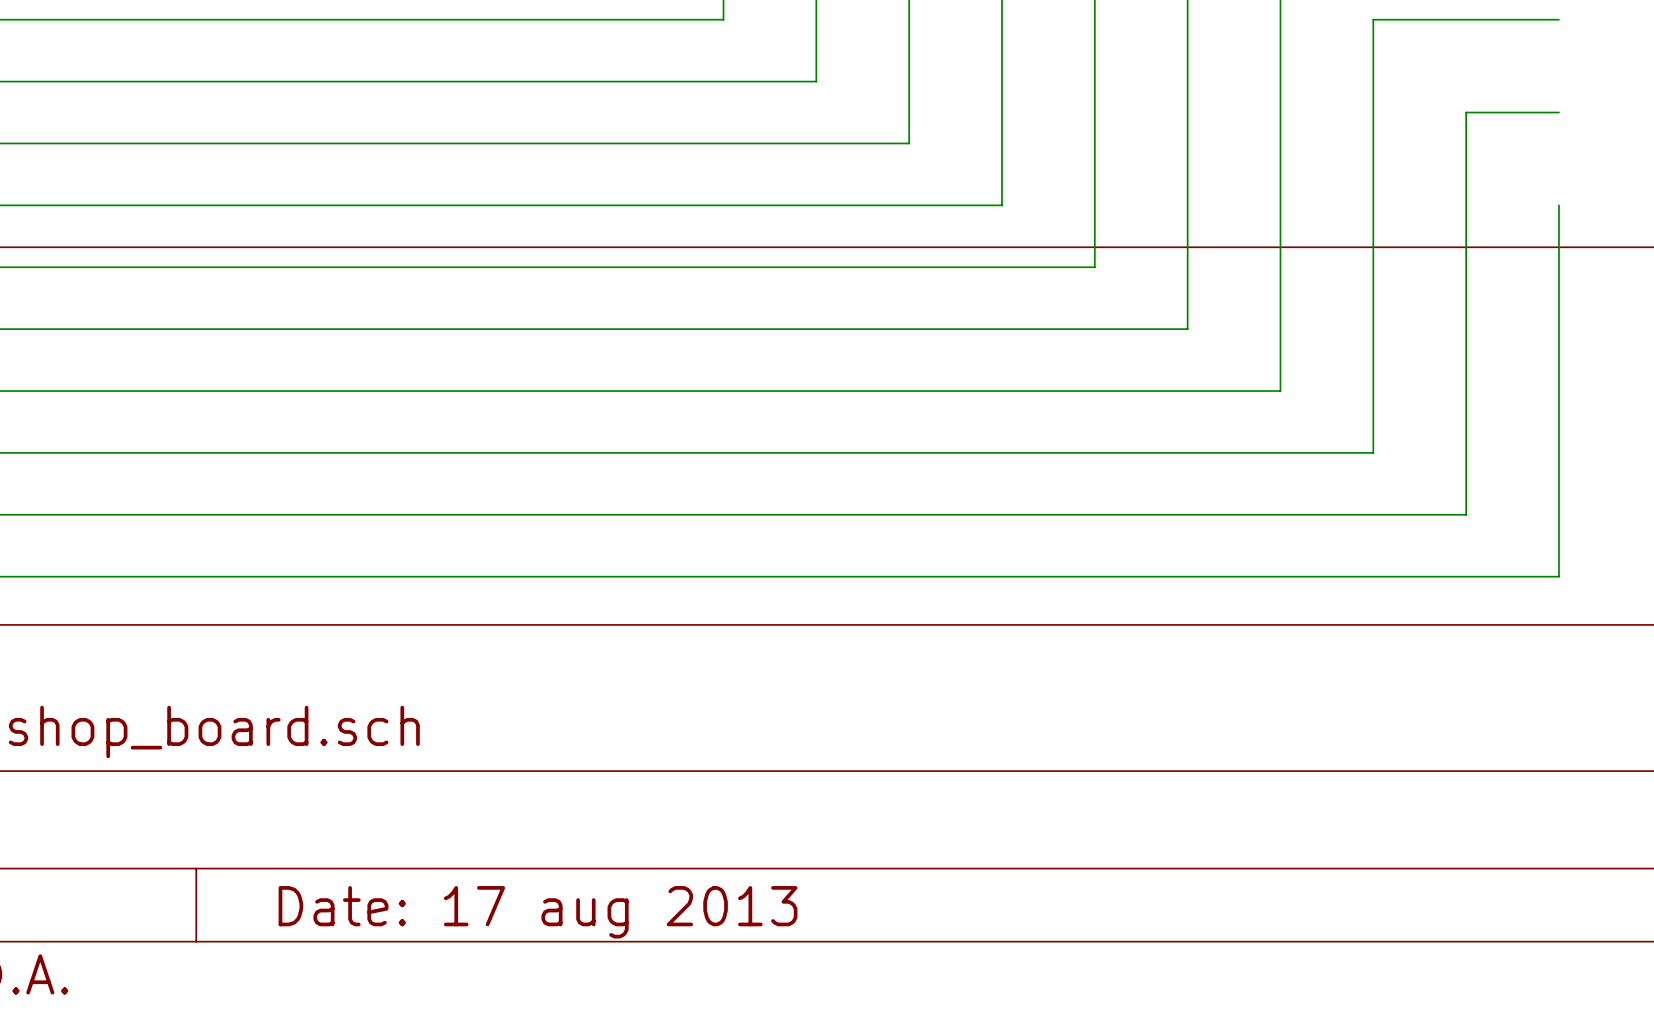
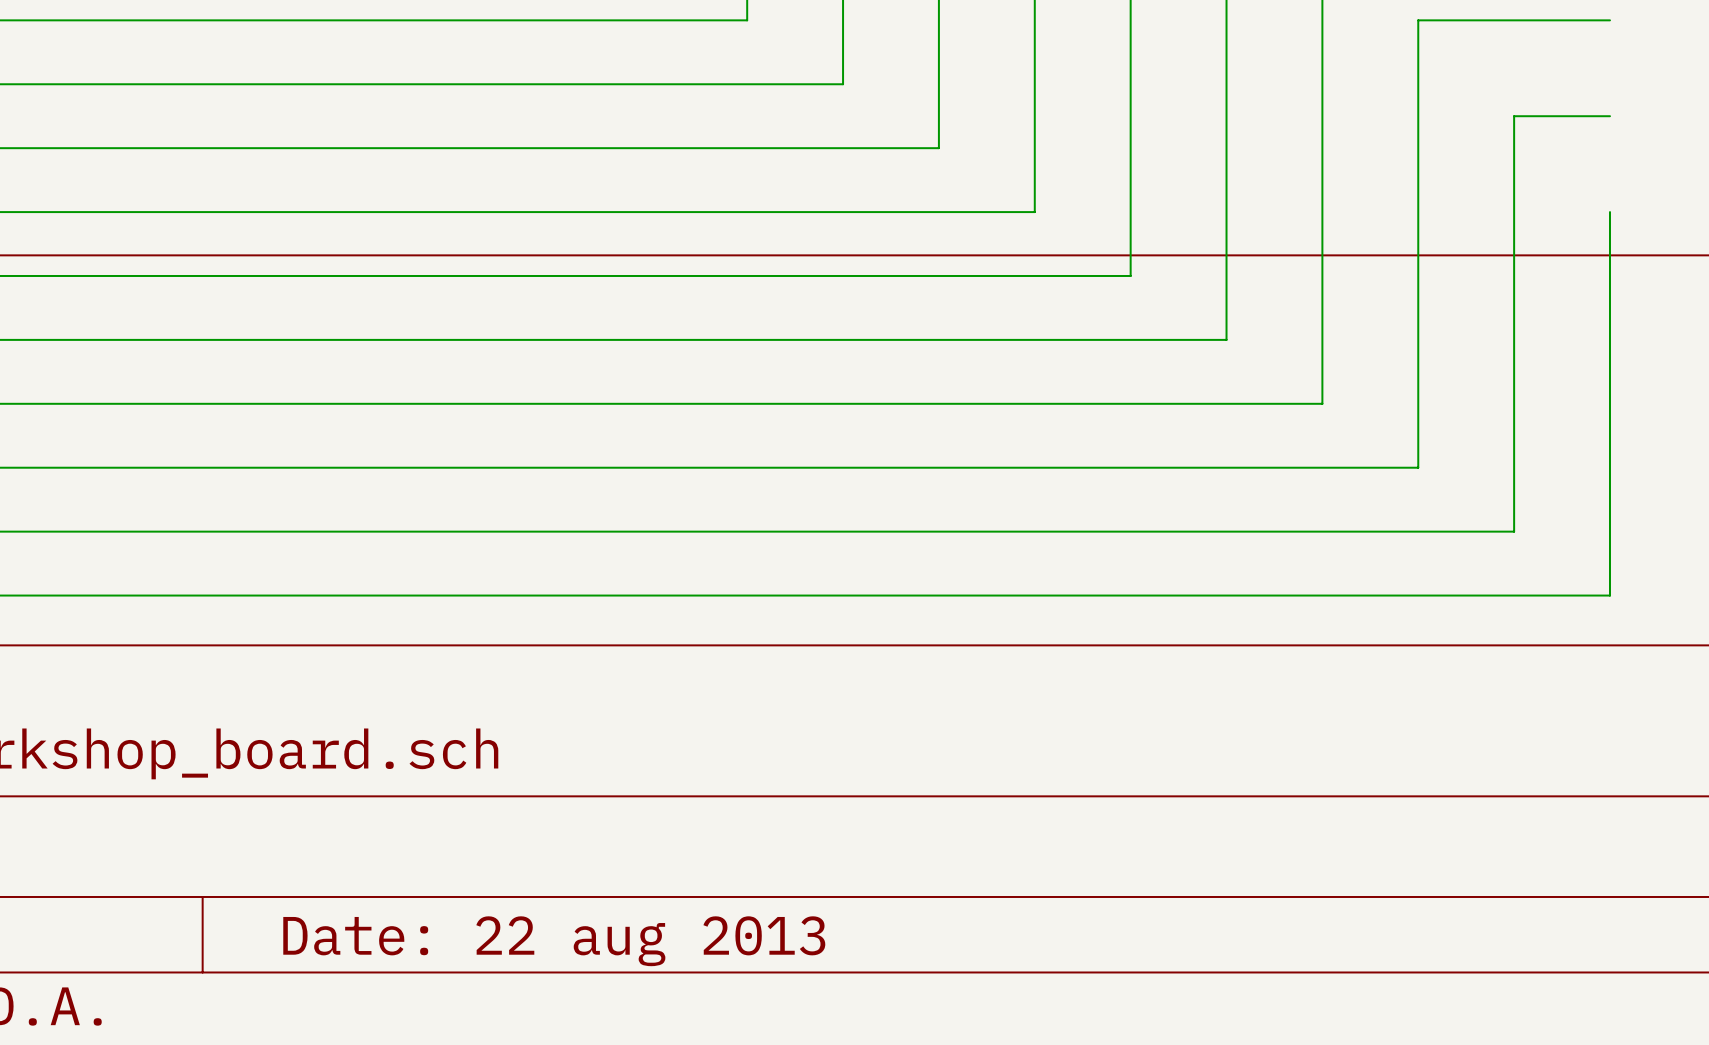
title block: Date: 17 aug 2013 (538, 912) -> Date: 22 aug 2013 (554, 941)

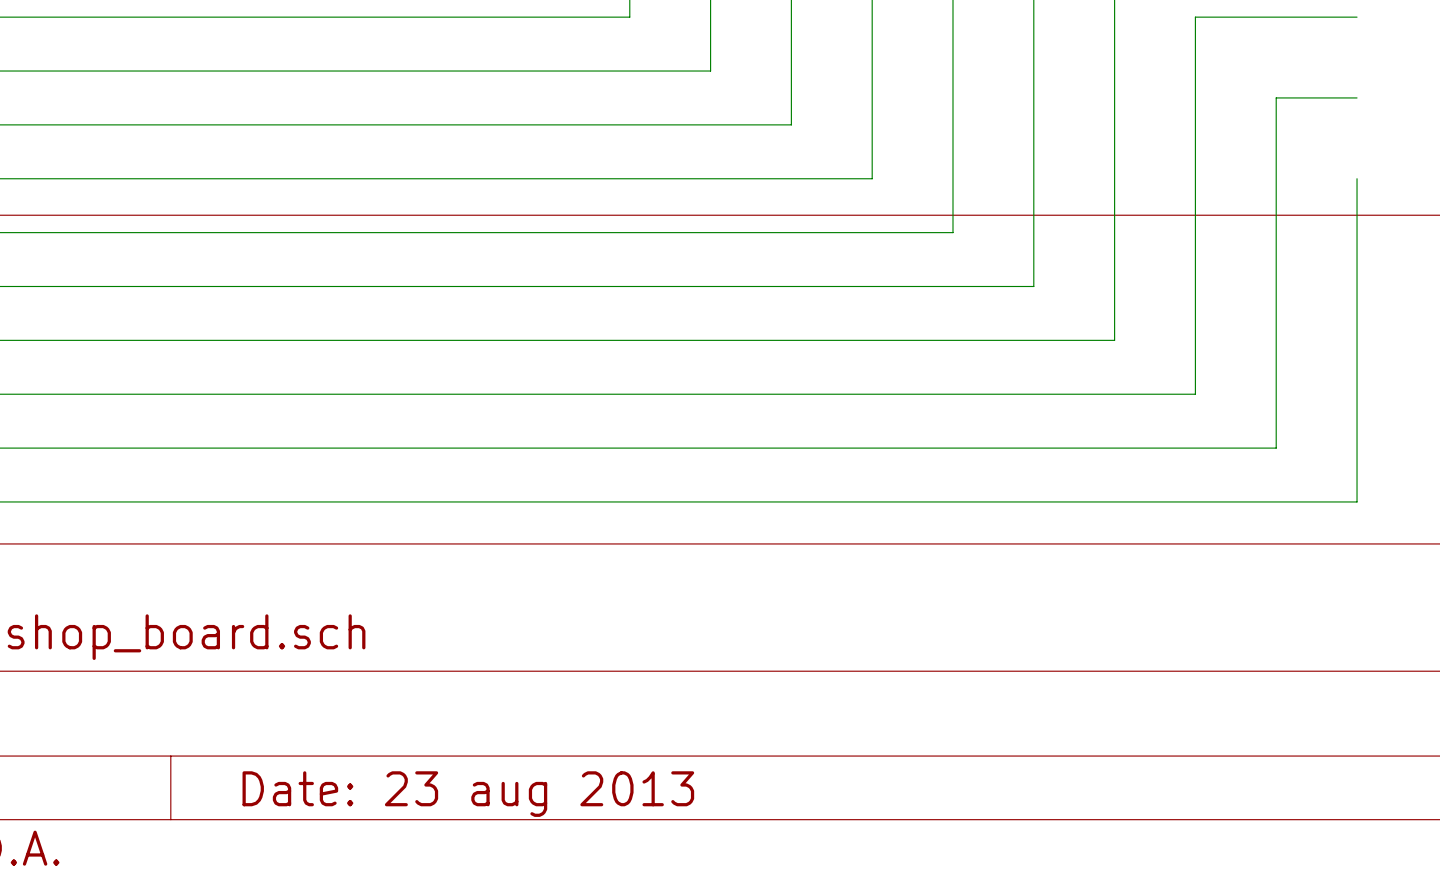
title block: Date: 22 aug 2013 (554, 941) -> Date: 23 aug 2013 (468, 794)

